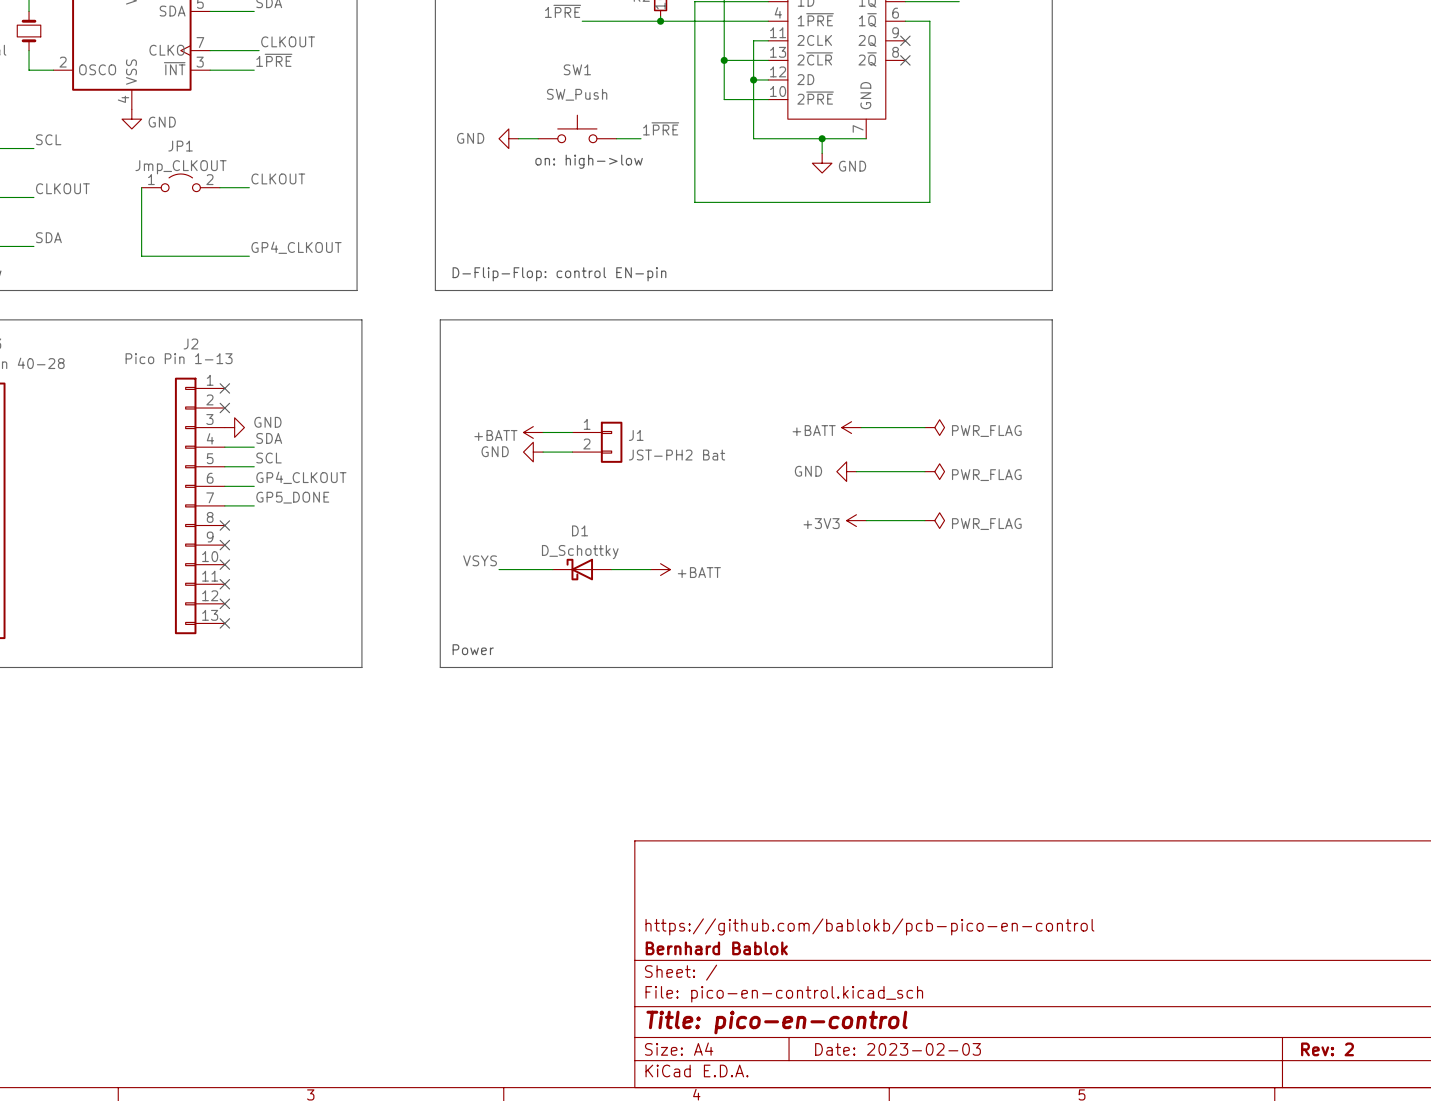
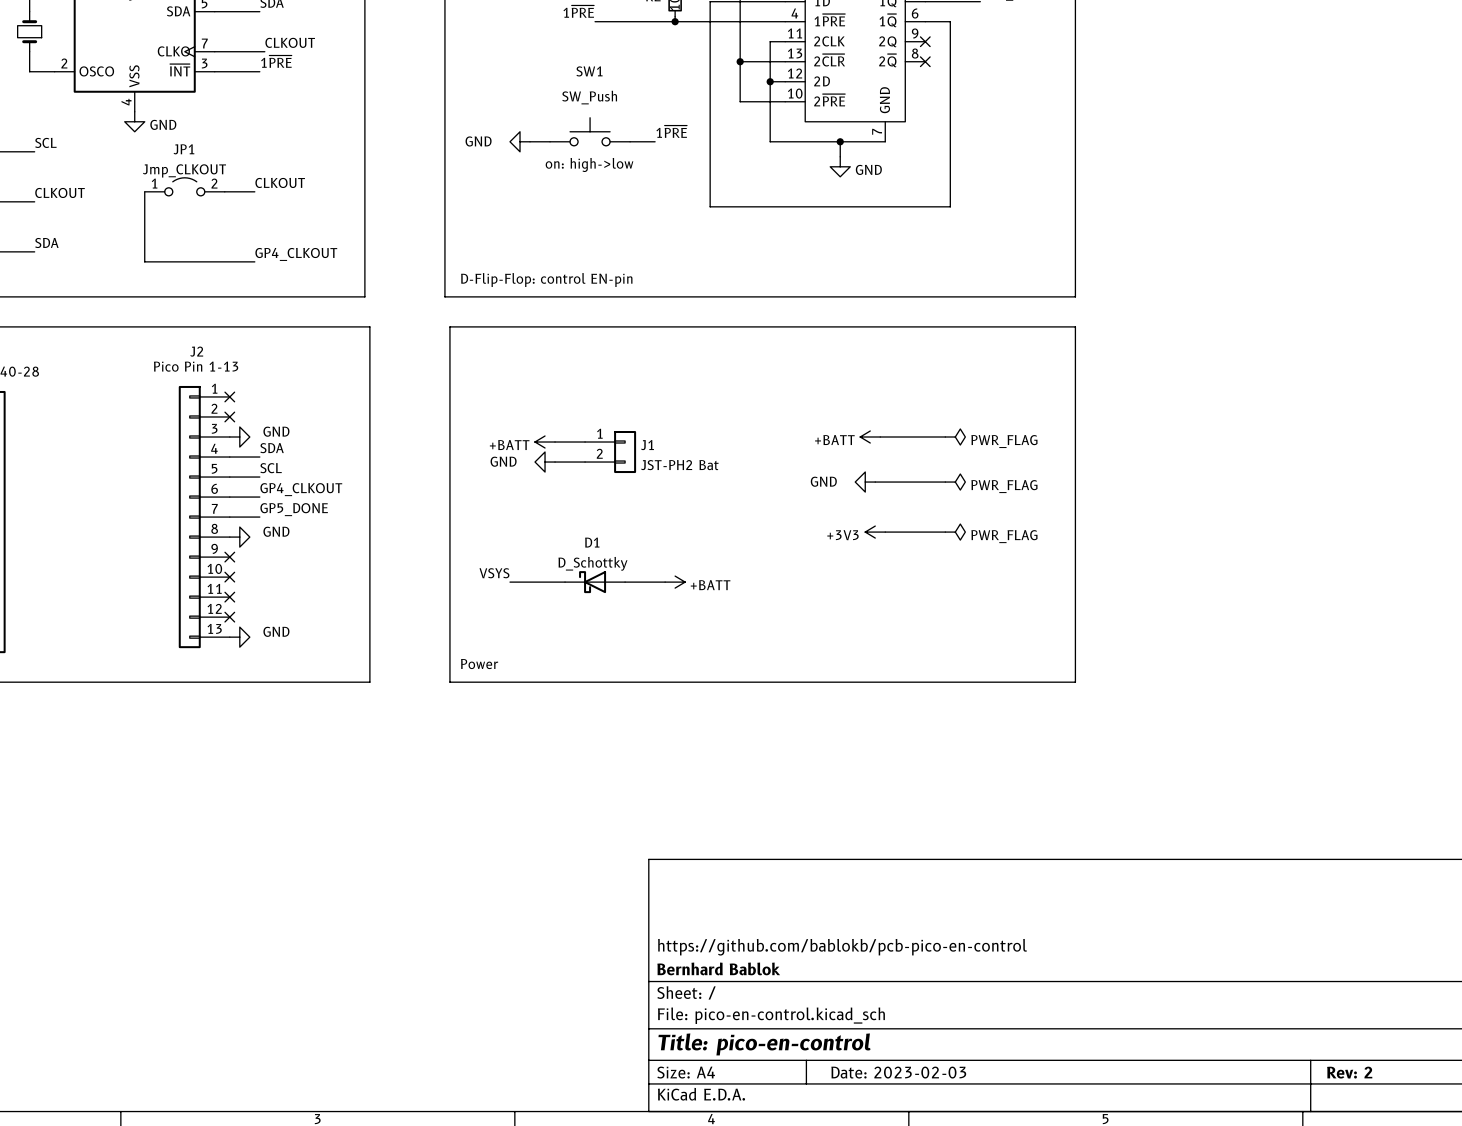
no-connect mark: (224, 525) -> none
power symbol: none -> GND (239, 537)
no-connect mark: (224, 623) -> none
power symbol: none -> GND (239, 637)

